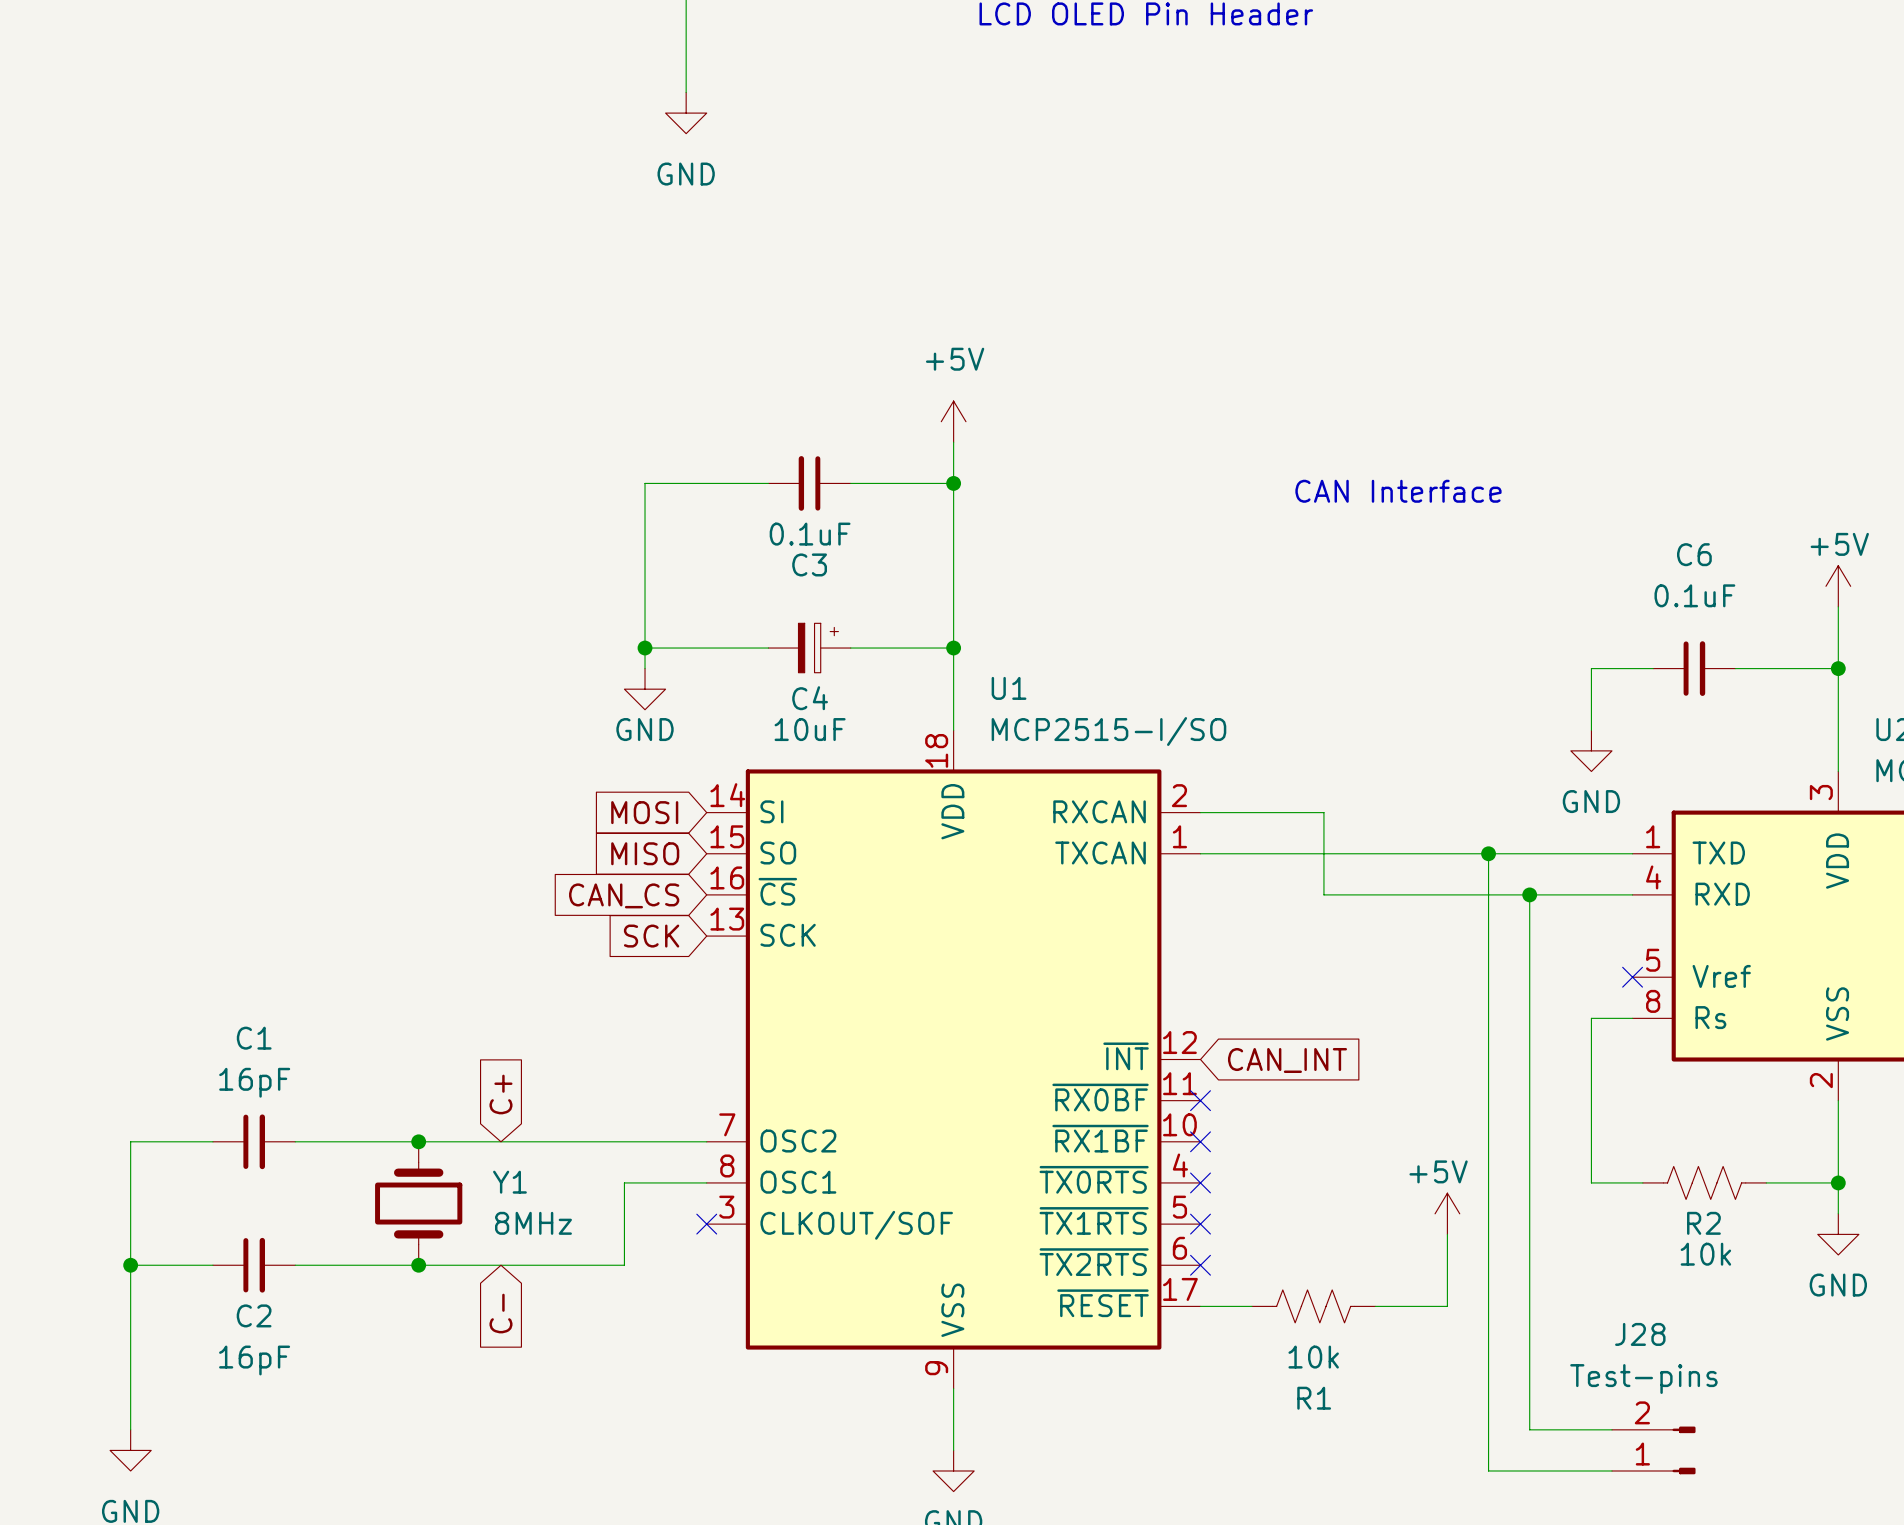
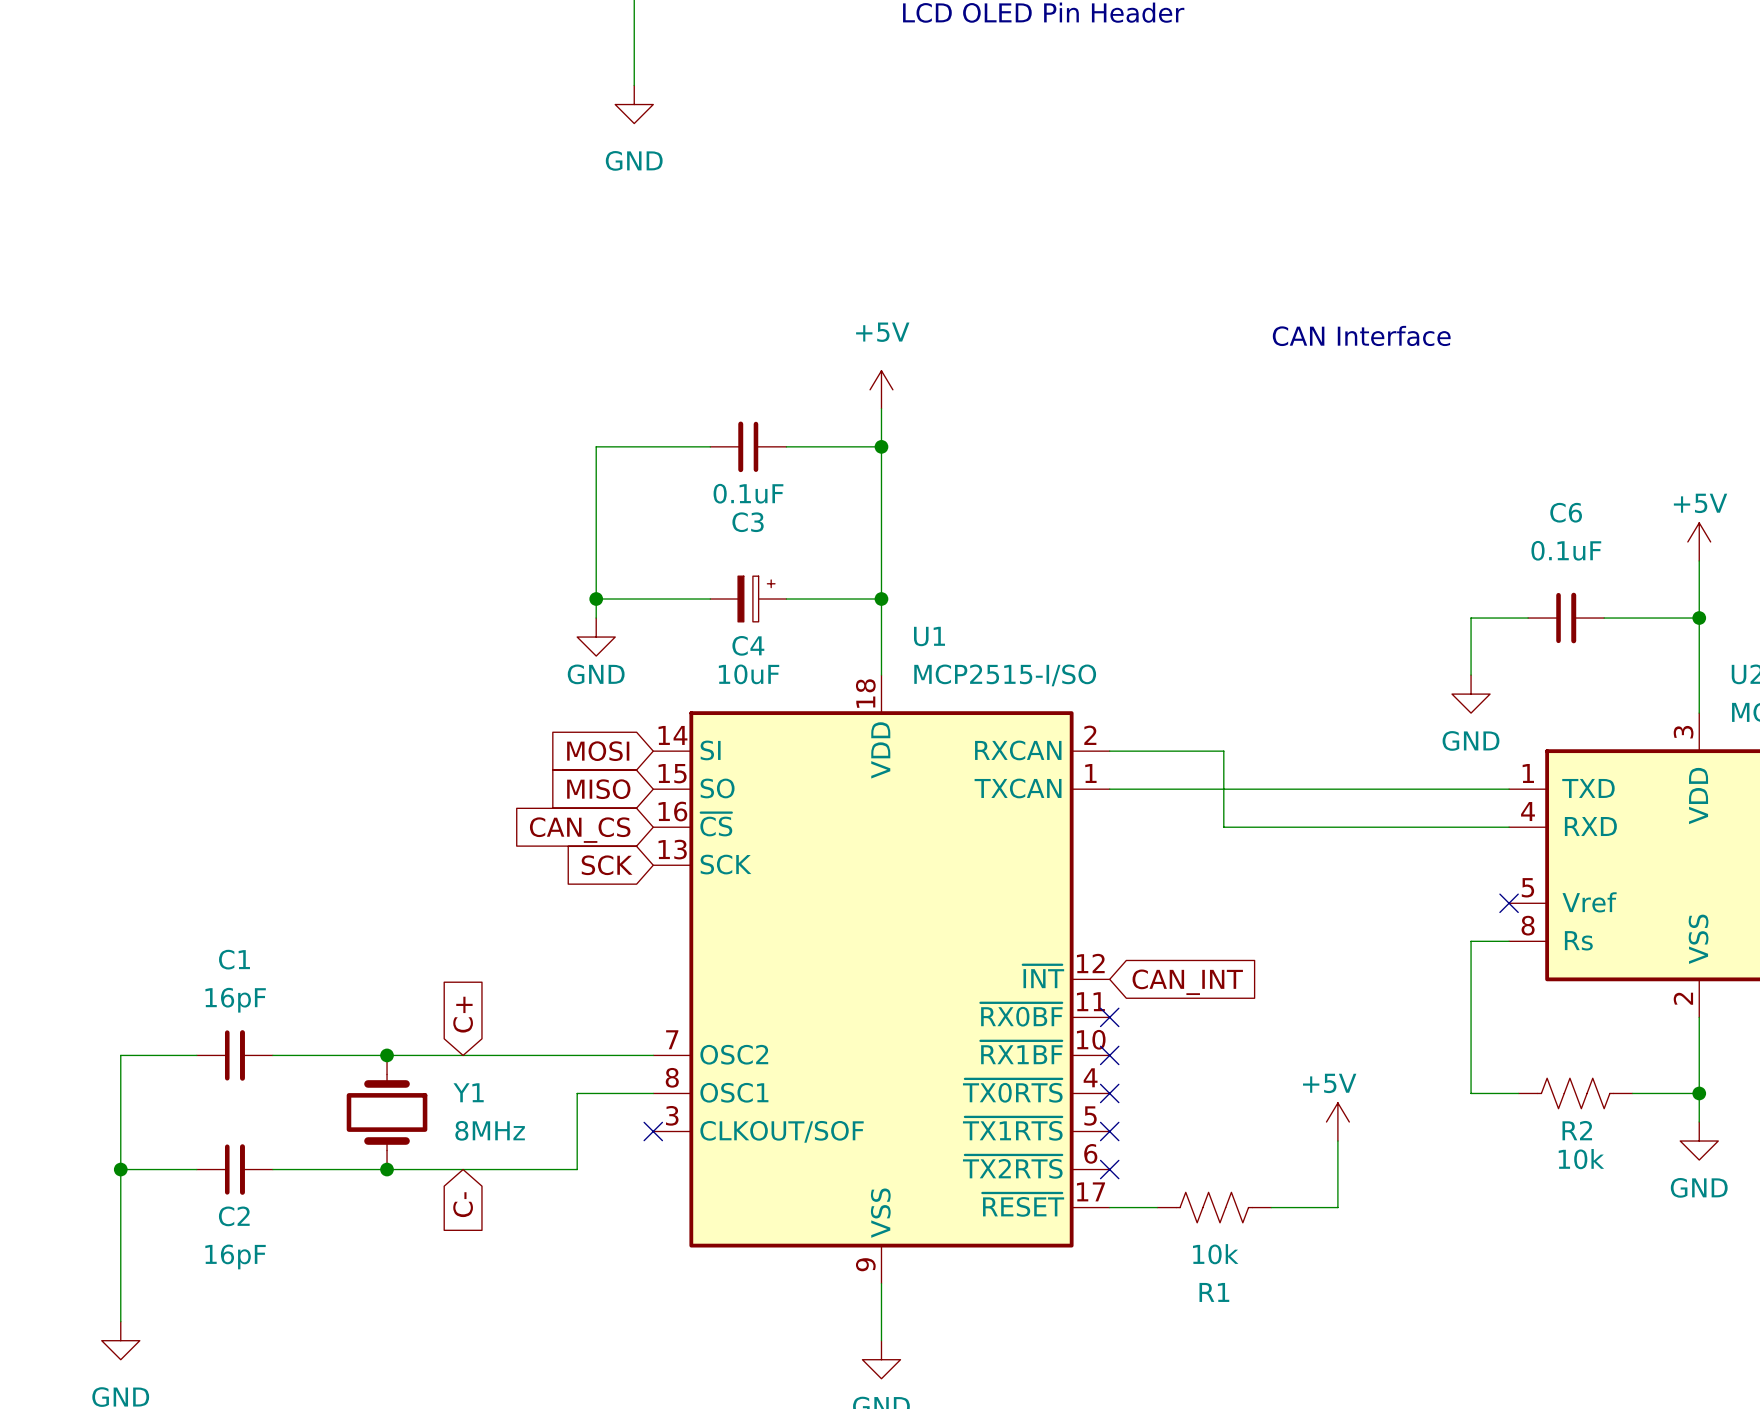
text position: CAN Interface (1398, 491) -> CAN Interface (1361, 335)
wire: (1488, 853) (1488, 1470) (1612, 1470) -> none
junction: (1488, 853) -> none
wire: (1529, 894) (1529, 1429) (1612, 1429) -> none
junction: (1529, 894) -> none
J28: Test-pins (1653, 1450) -> none

